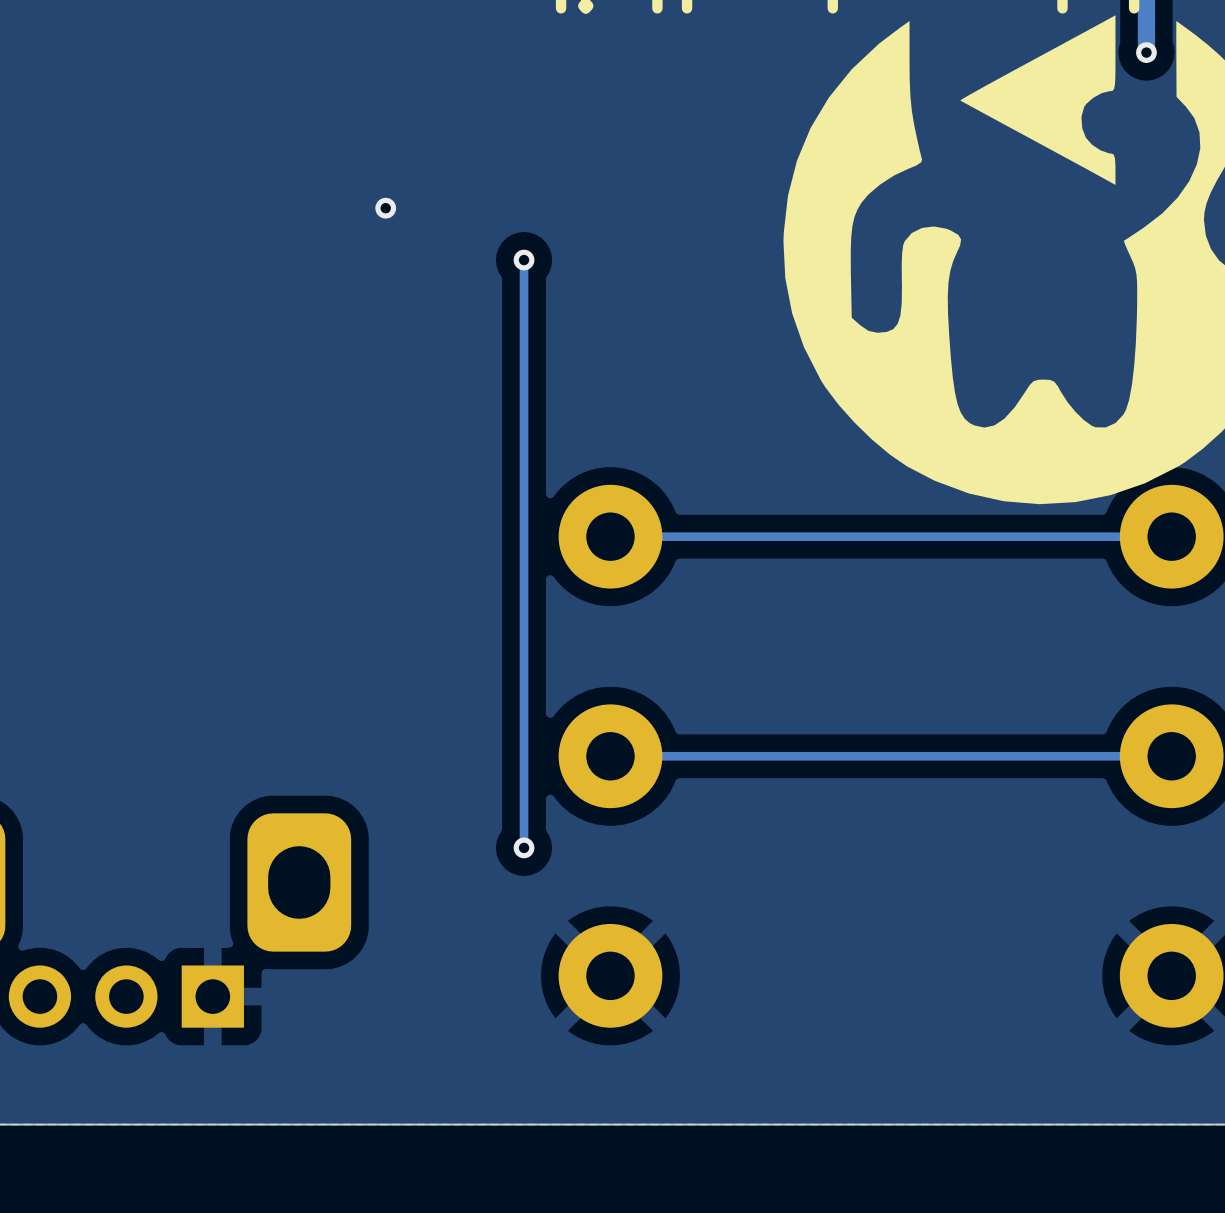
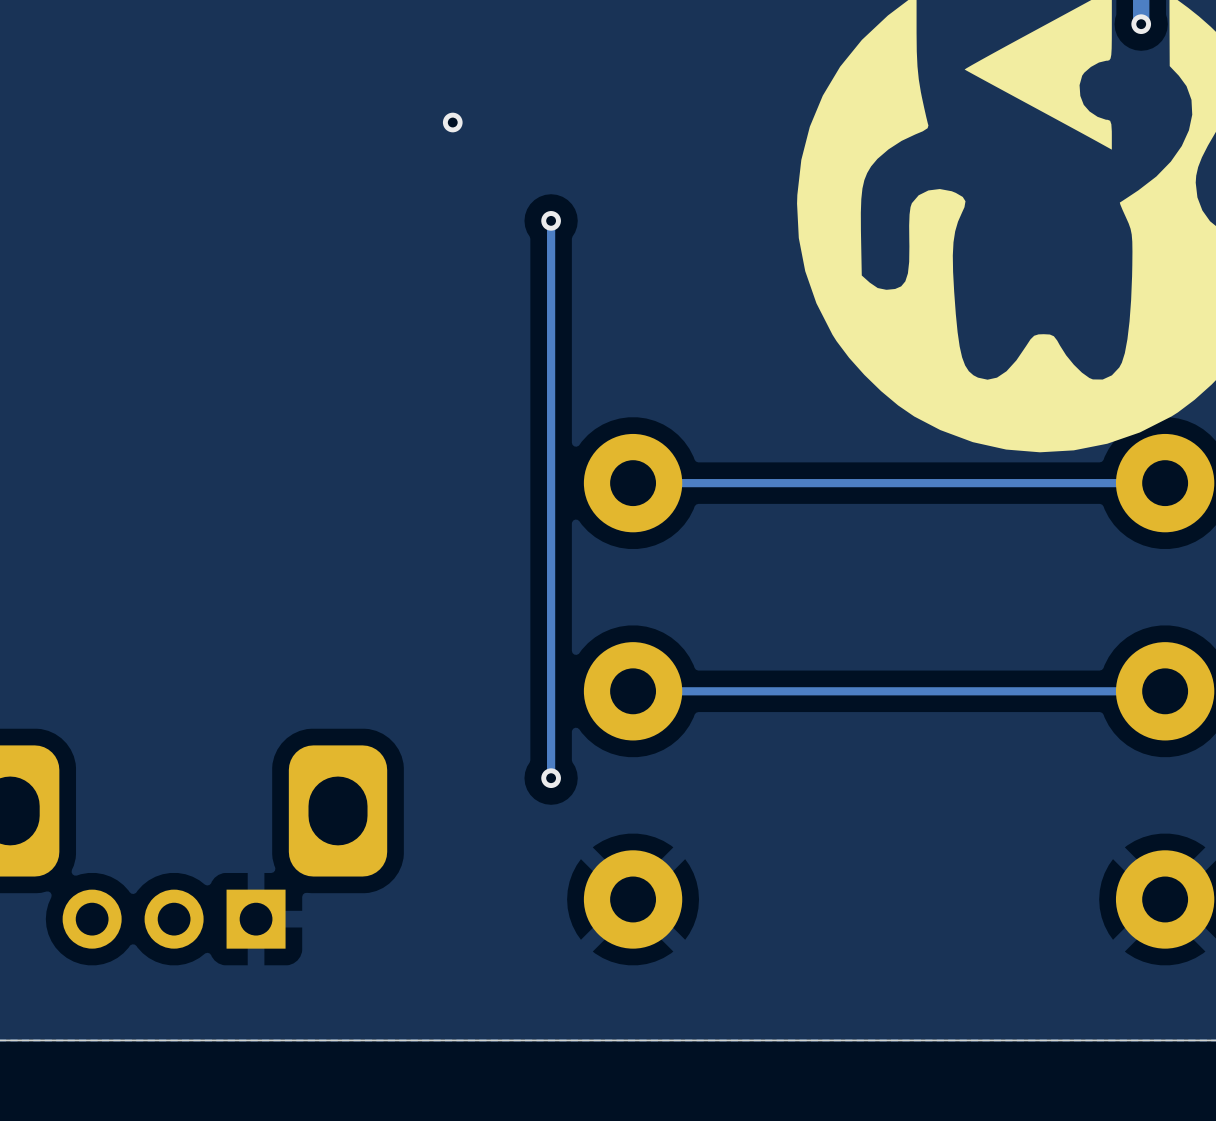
via position: (385, 208) -> (452, 122)

